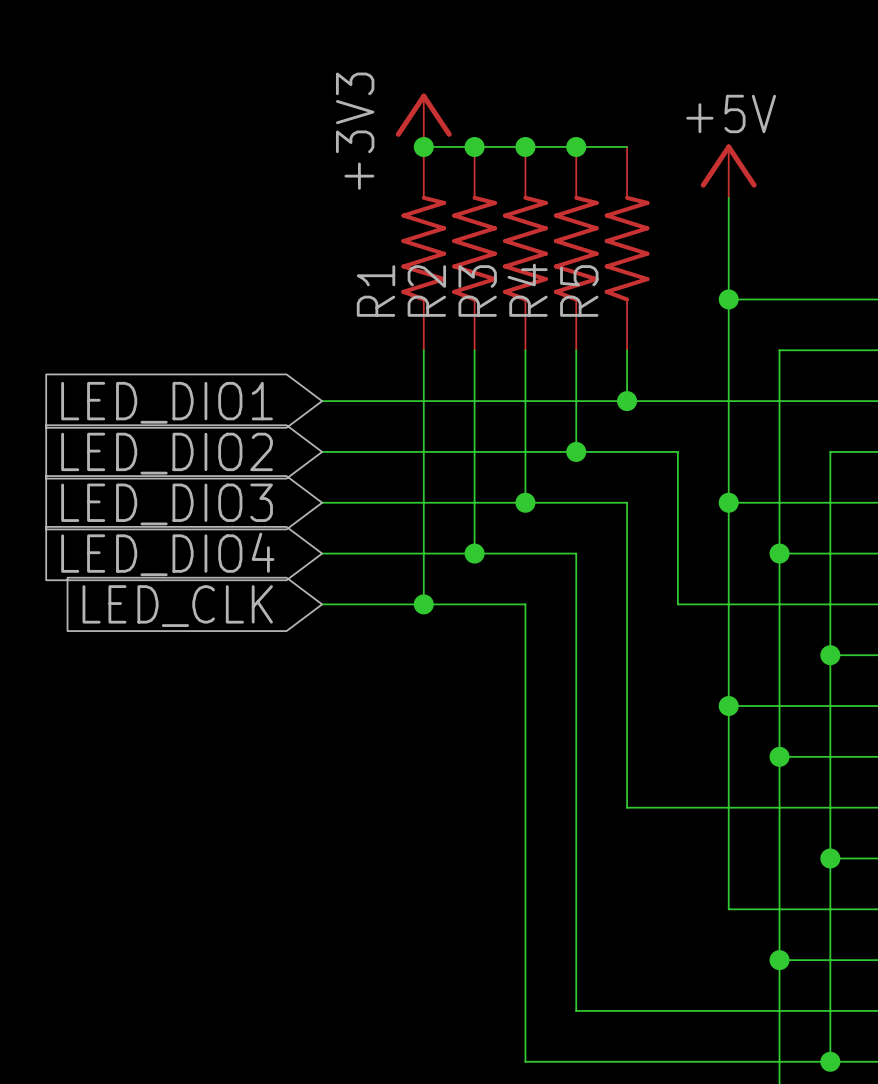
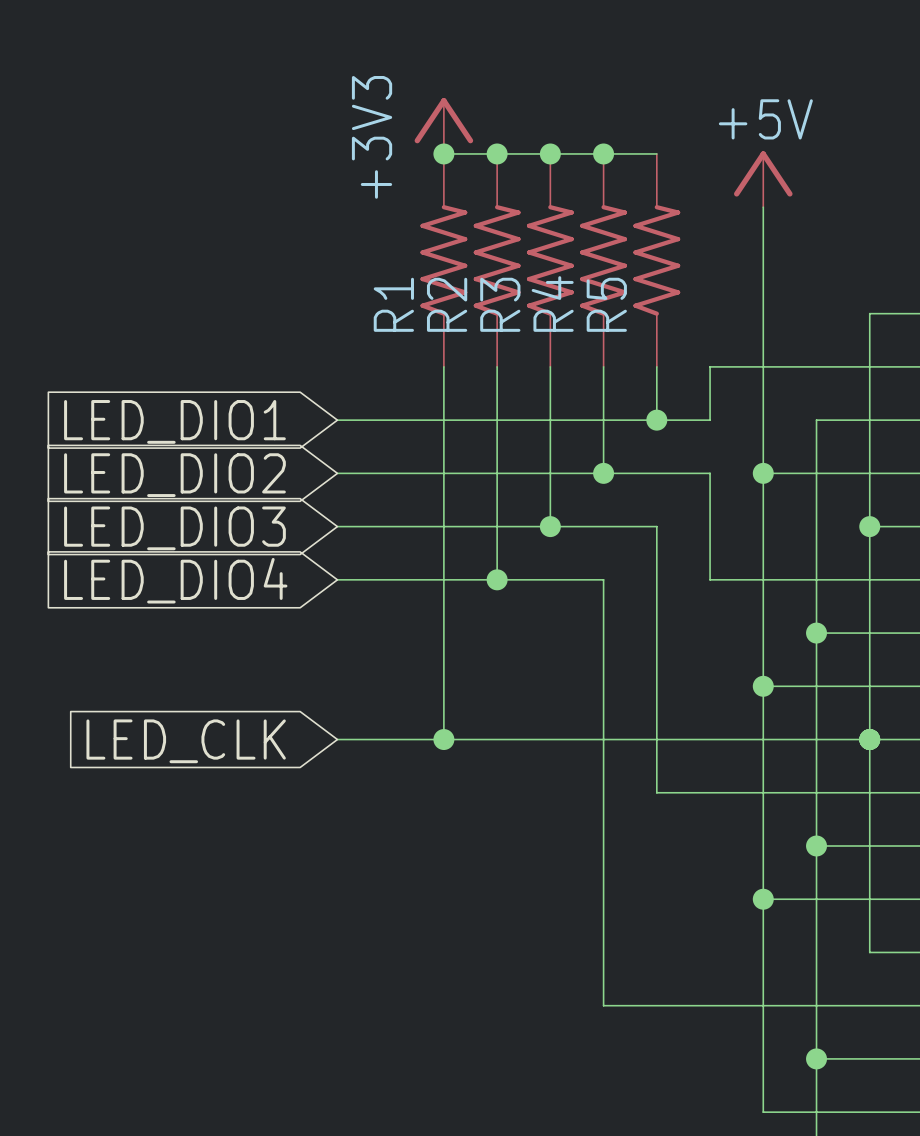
wire: (728, 299) (830, 299) -> (763, 473) (869, 473) (869, 313)
junction: (728, 299) -> none
wire: (779, 350) (779, 401) (677, 401) -> (816, 366) (710, 366) (710, 420)
junction: none -> (763, 473)
wire: (728, 502) (830, 502) -> (763, 899) (869, 899)
junction: (728, 502) -> none
junction: none -> (869, 526)
wire: (677, 553) (677, 604) (779, 604) -> (710, 579) (816, 579)
junction: (779, 553) -> none
wire: (322, 604) (525, 604) (525, 1061) (728, 1061) -> none
wire: none -> (443, 633) (443, 739)
junction position: (423, 604) -> (443, 739)
junction: none -> (816, 633)
global label position: LED_CLK (177, 606) -> LED_CLK (186, 741)
wire: none -> (763, 686) (869, 686)
junction: none -> (763, 686)
junction: (830, 655) -> none
wire: none -> (337, 739) (763, 739)
junction: (728, 706) -> none
junction: none -> (869, 739)
wire: (627, 756) (627, 807) (779, 807) -> (656, 792) (816, 792)
junction: (779, 756) -> none
junction: none -> (816, 846)
junction: none -> (763, 899)
junction: (830, 858) -> none
wire: (728, 909) (830, 909) (830, 1061) -> (763, 952) (763, 1112)
wire: (576, 960) (576, 1010) (779, 1010) -> (603, 1005) (816, 1005)
junction: (779, 960) -> none
junction: none -> (816, 1058)
junction: (830, 1061) -> none

